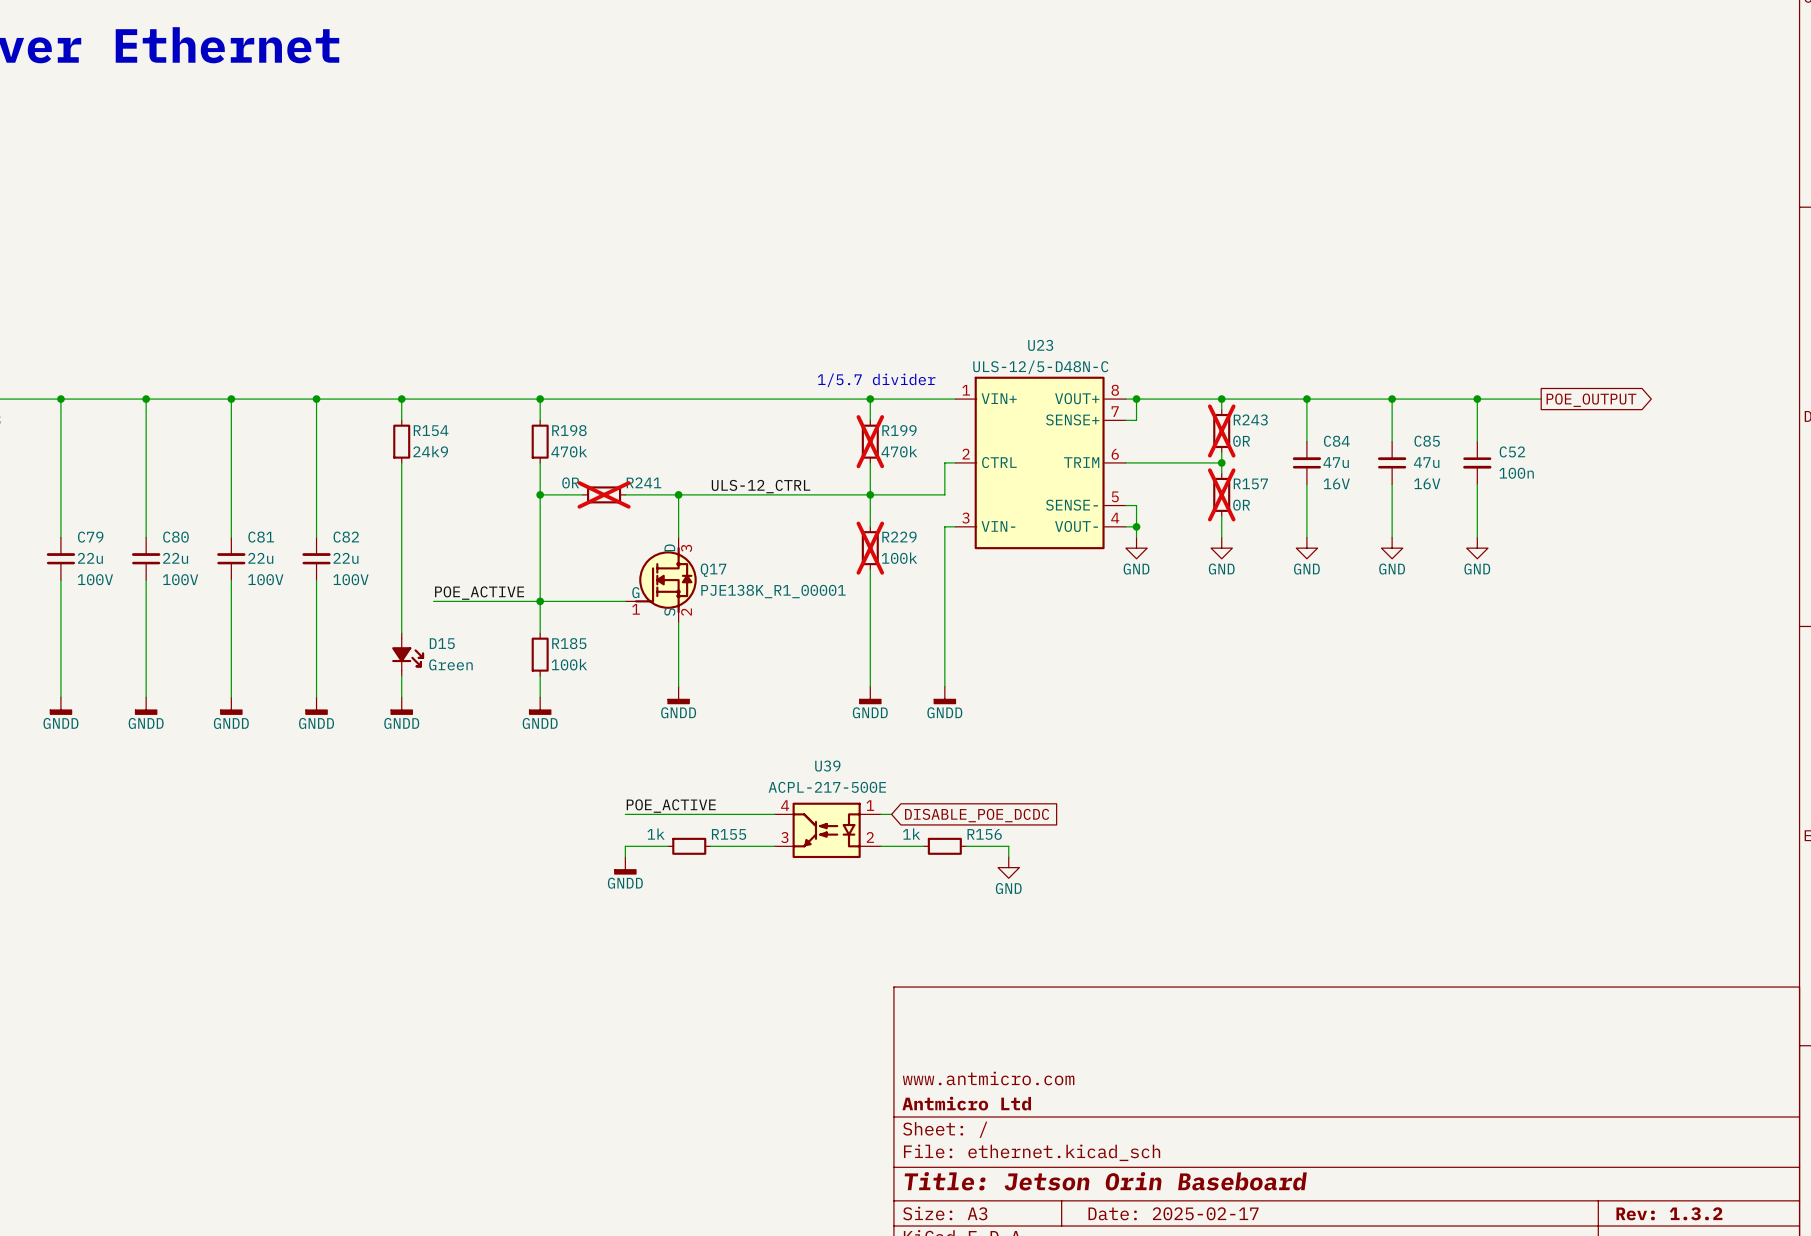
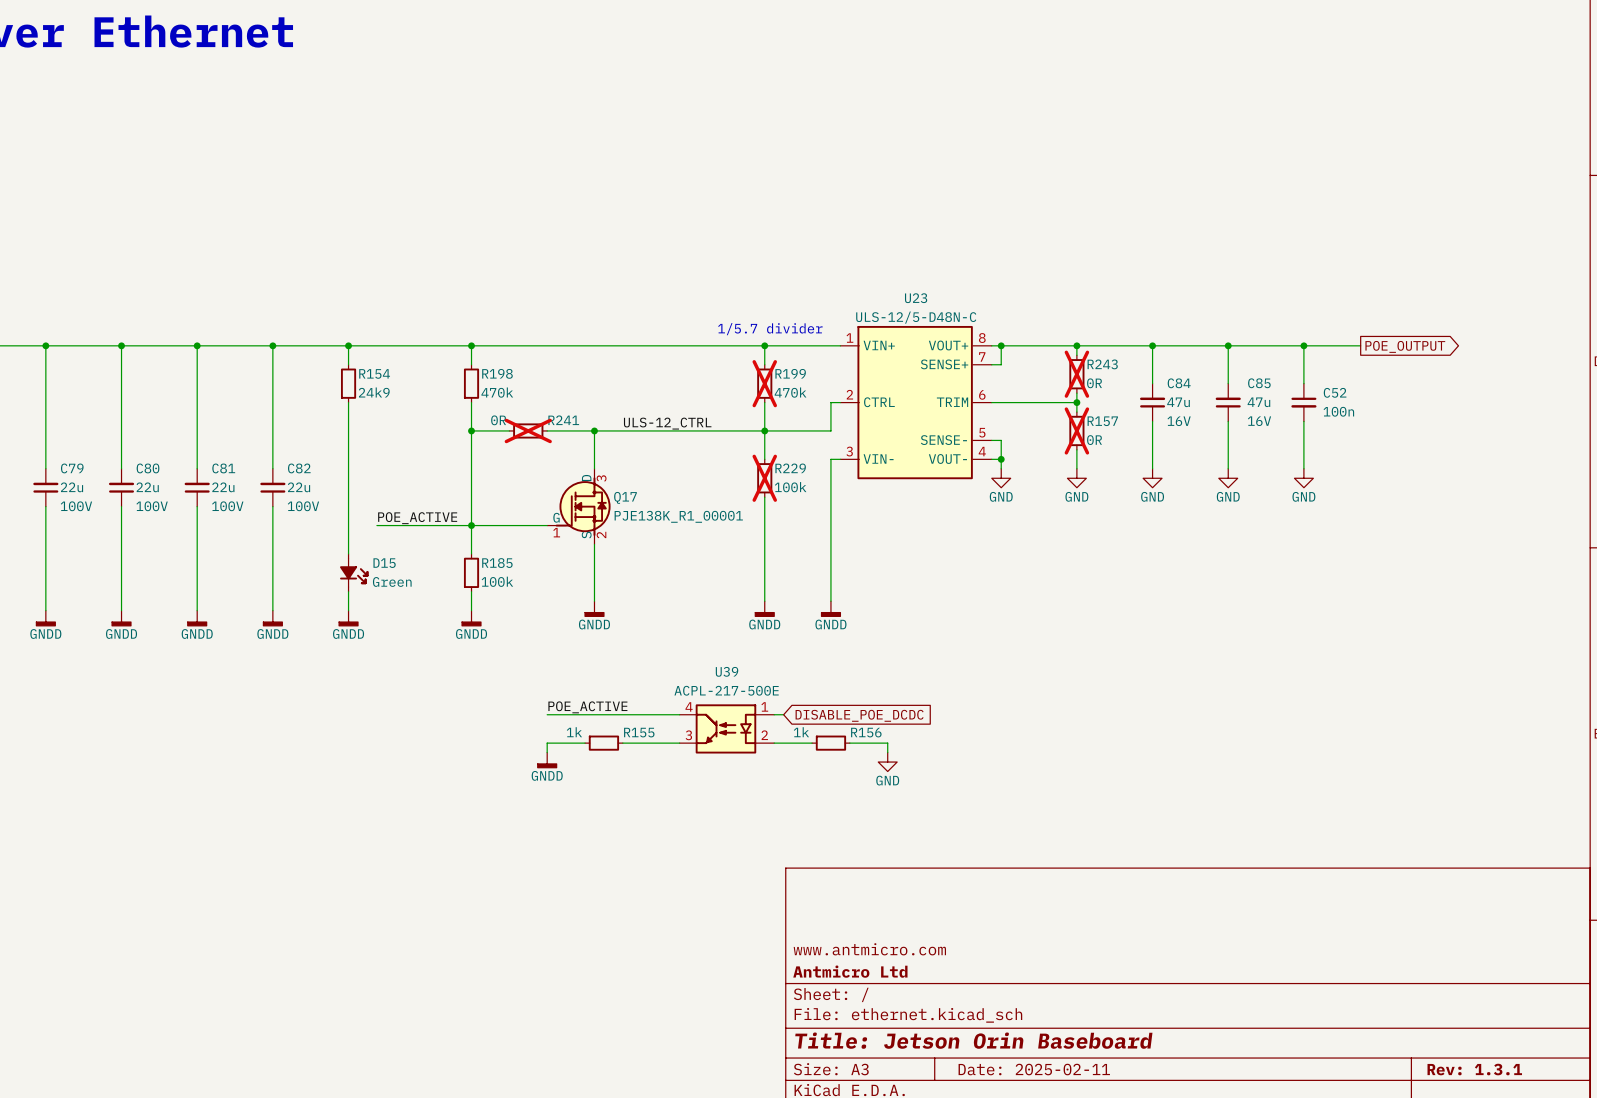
title block: Date: 2025-02-17 (1173, 1213) -> Date: 2025-02-11 (1034, 1069)
title block: Rev: 1.3.2 (1669, 1213) -> Rev: 1.3.1 (1474, 1069)

